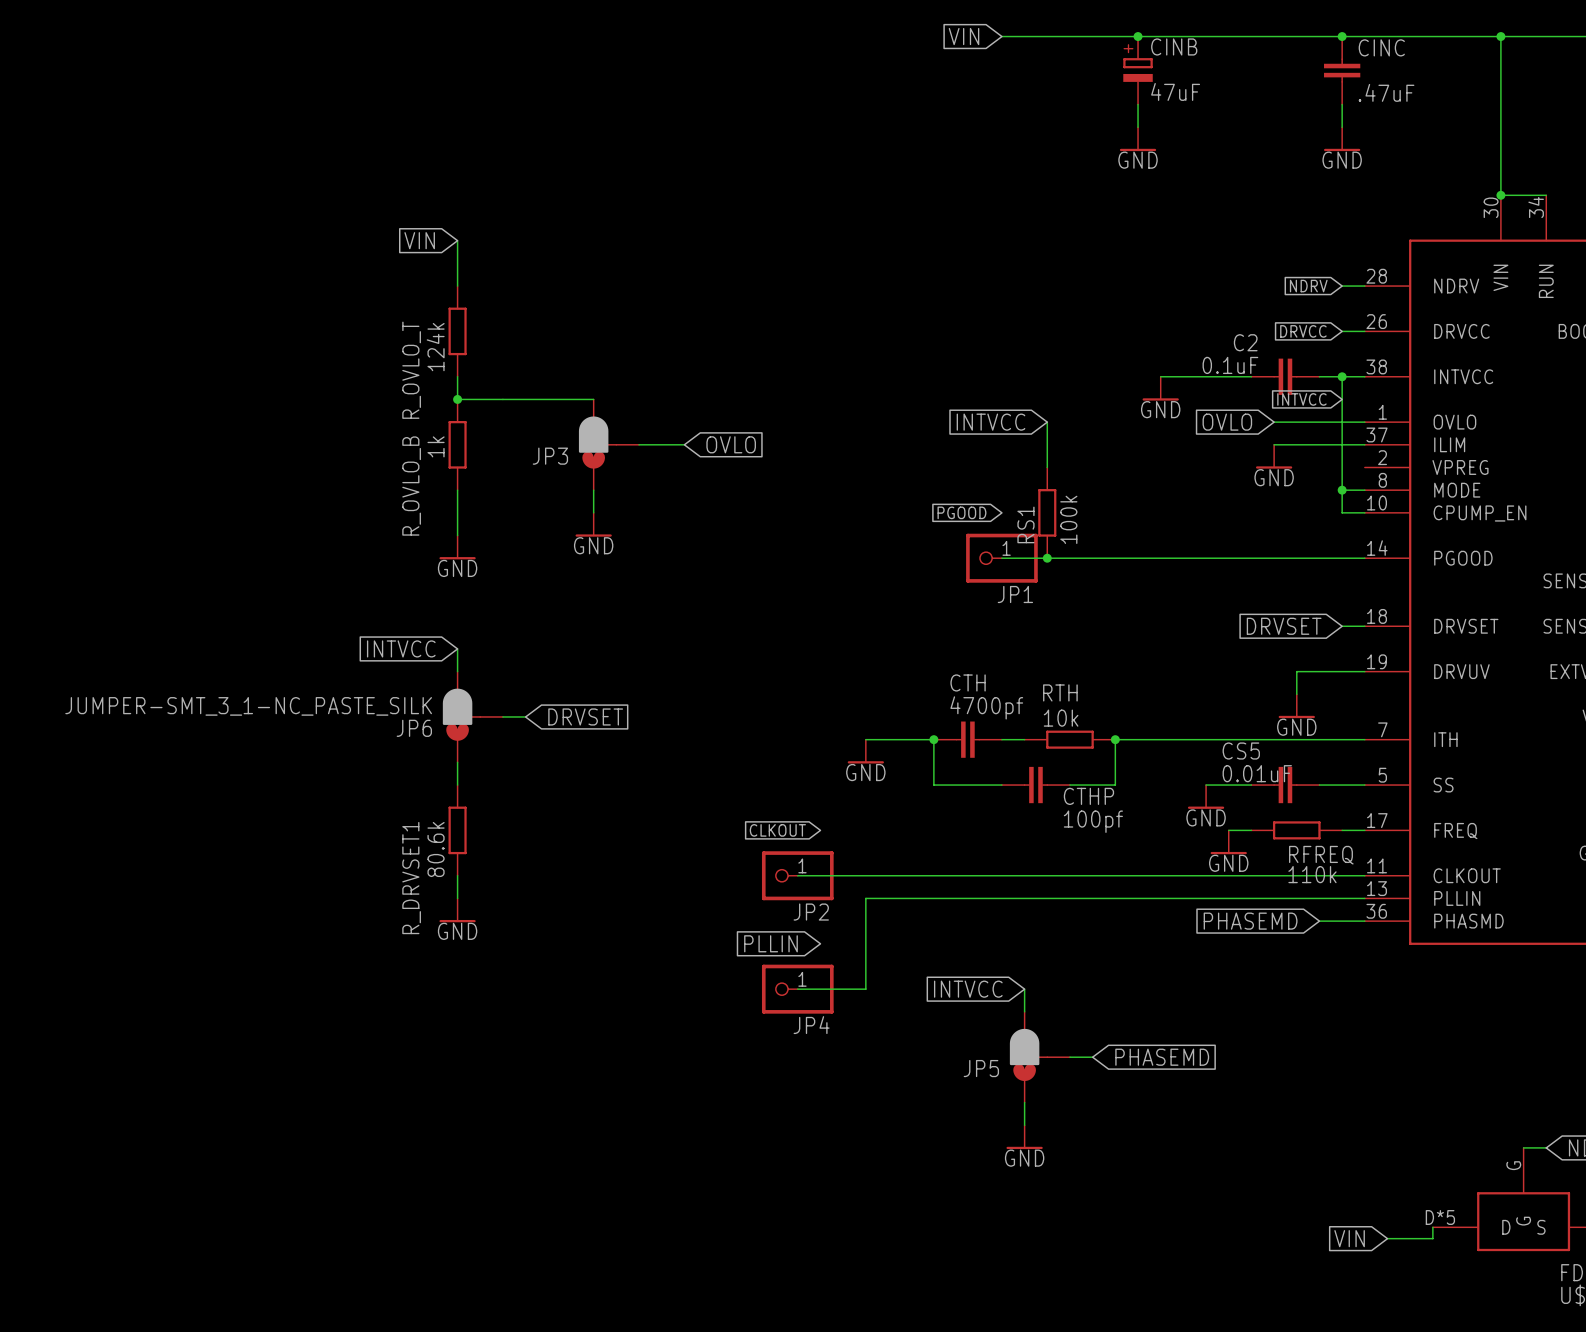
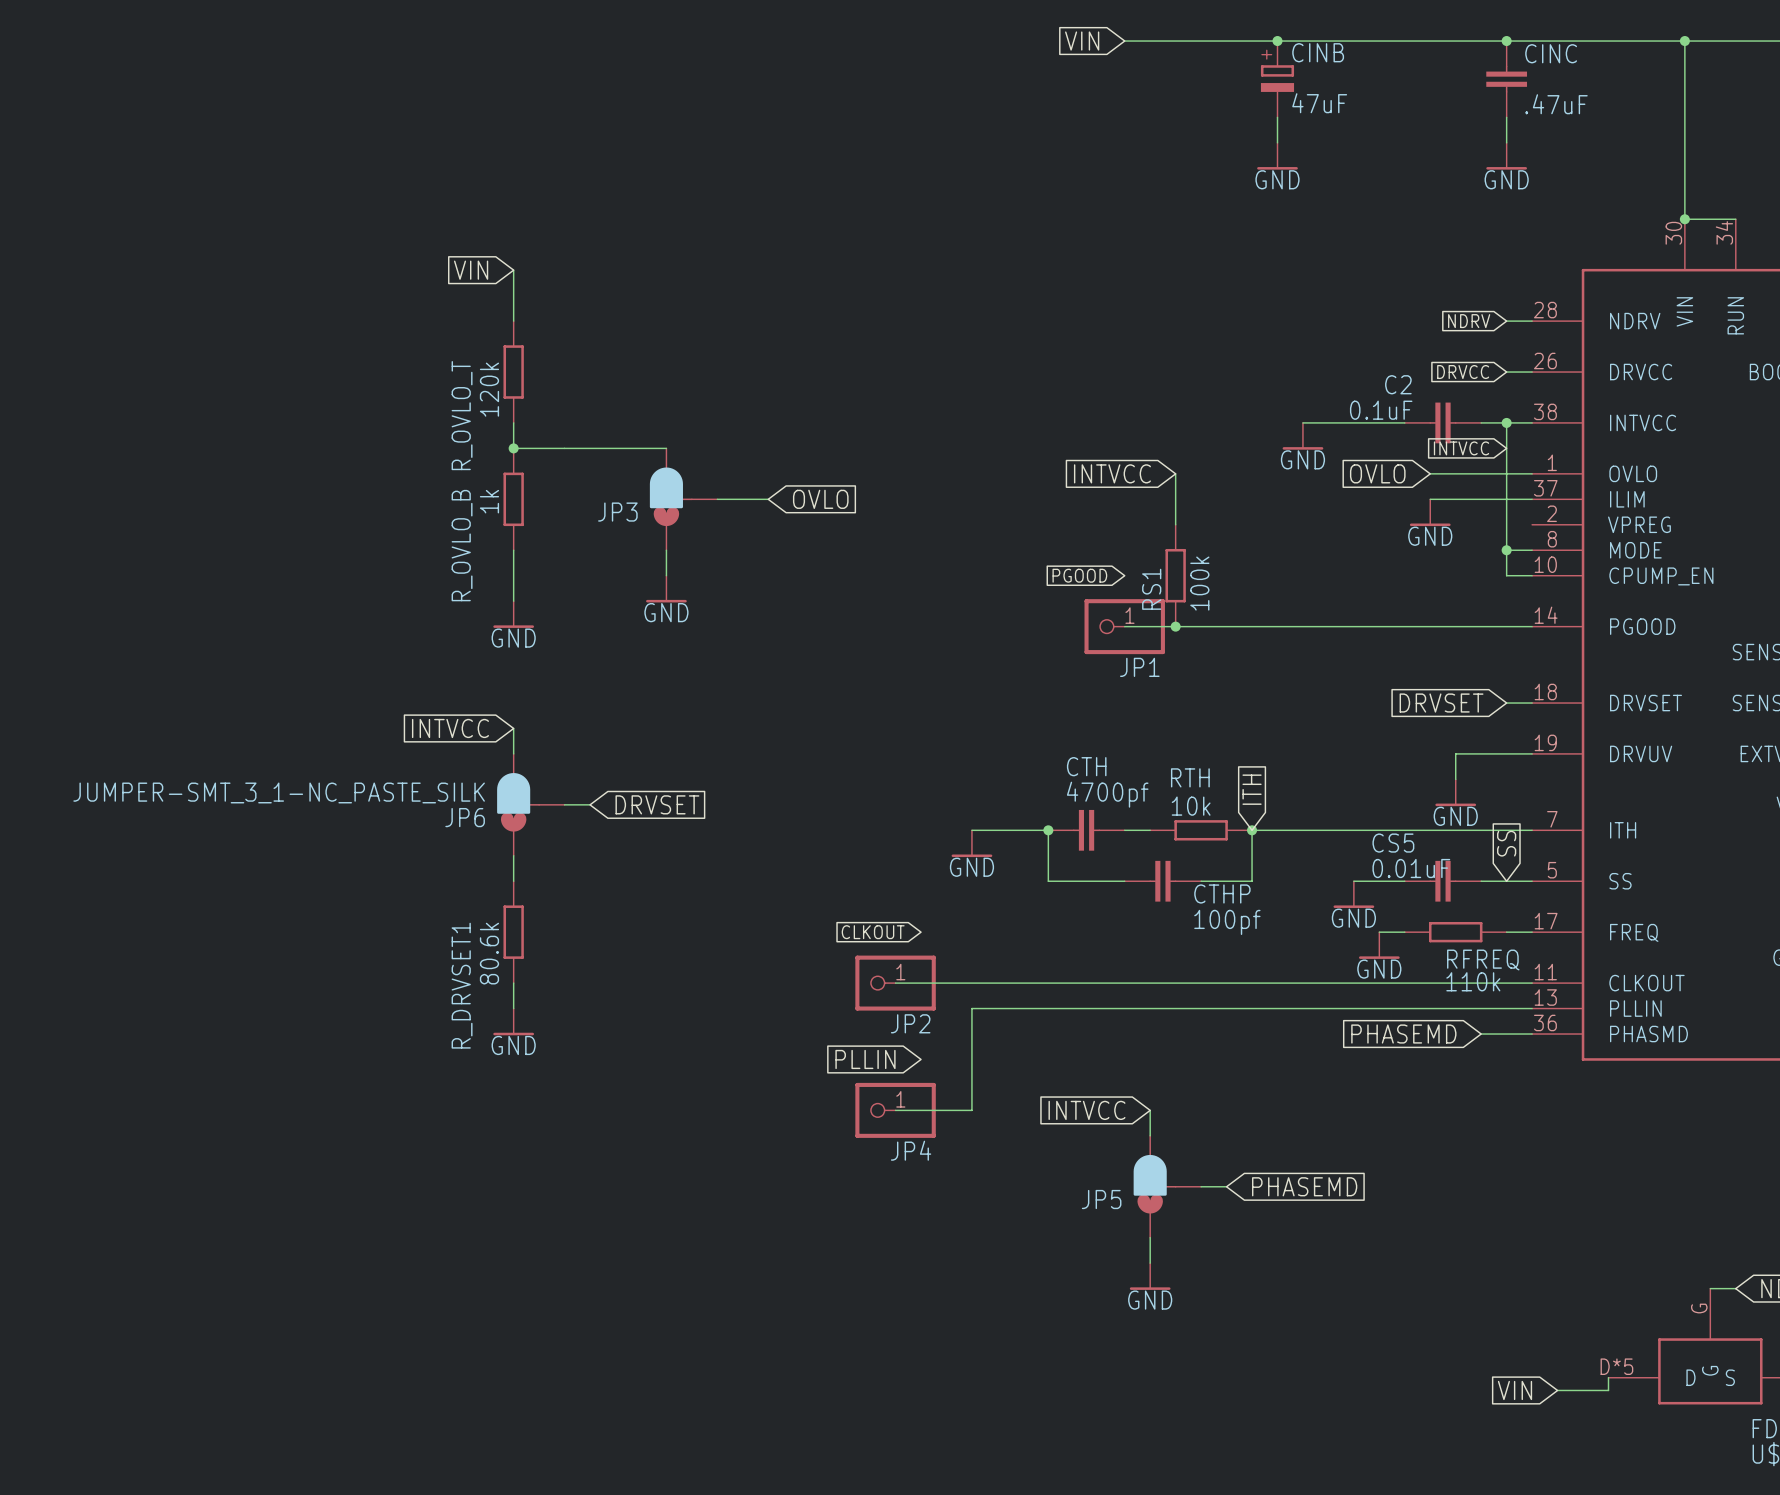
R_OVLO_T value: 124k (435, 347) -> 120k (489, 389)
global label: none -> ITH (1252, 789)
global label: none -> SS (1506, 843)

